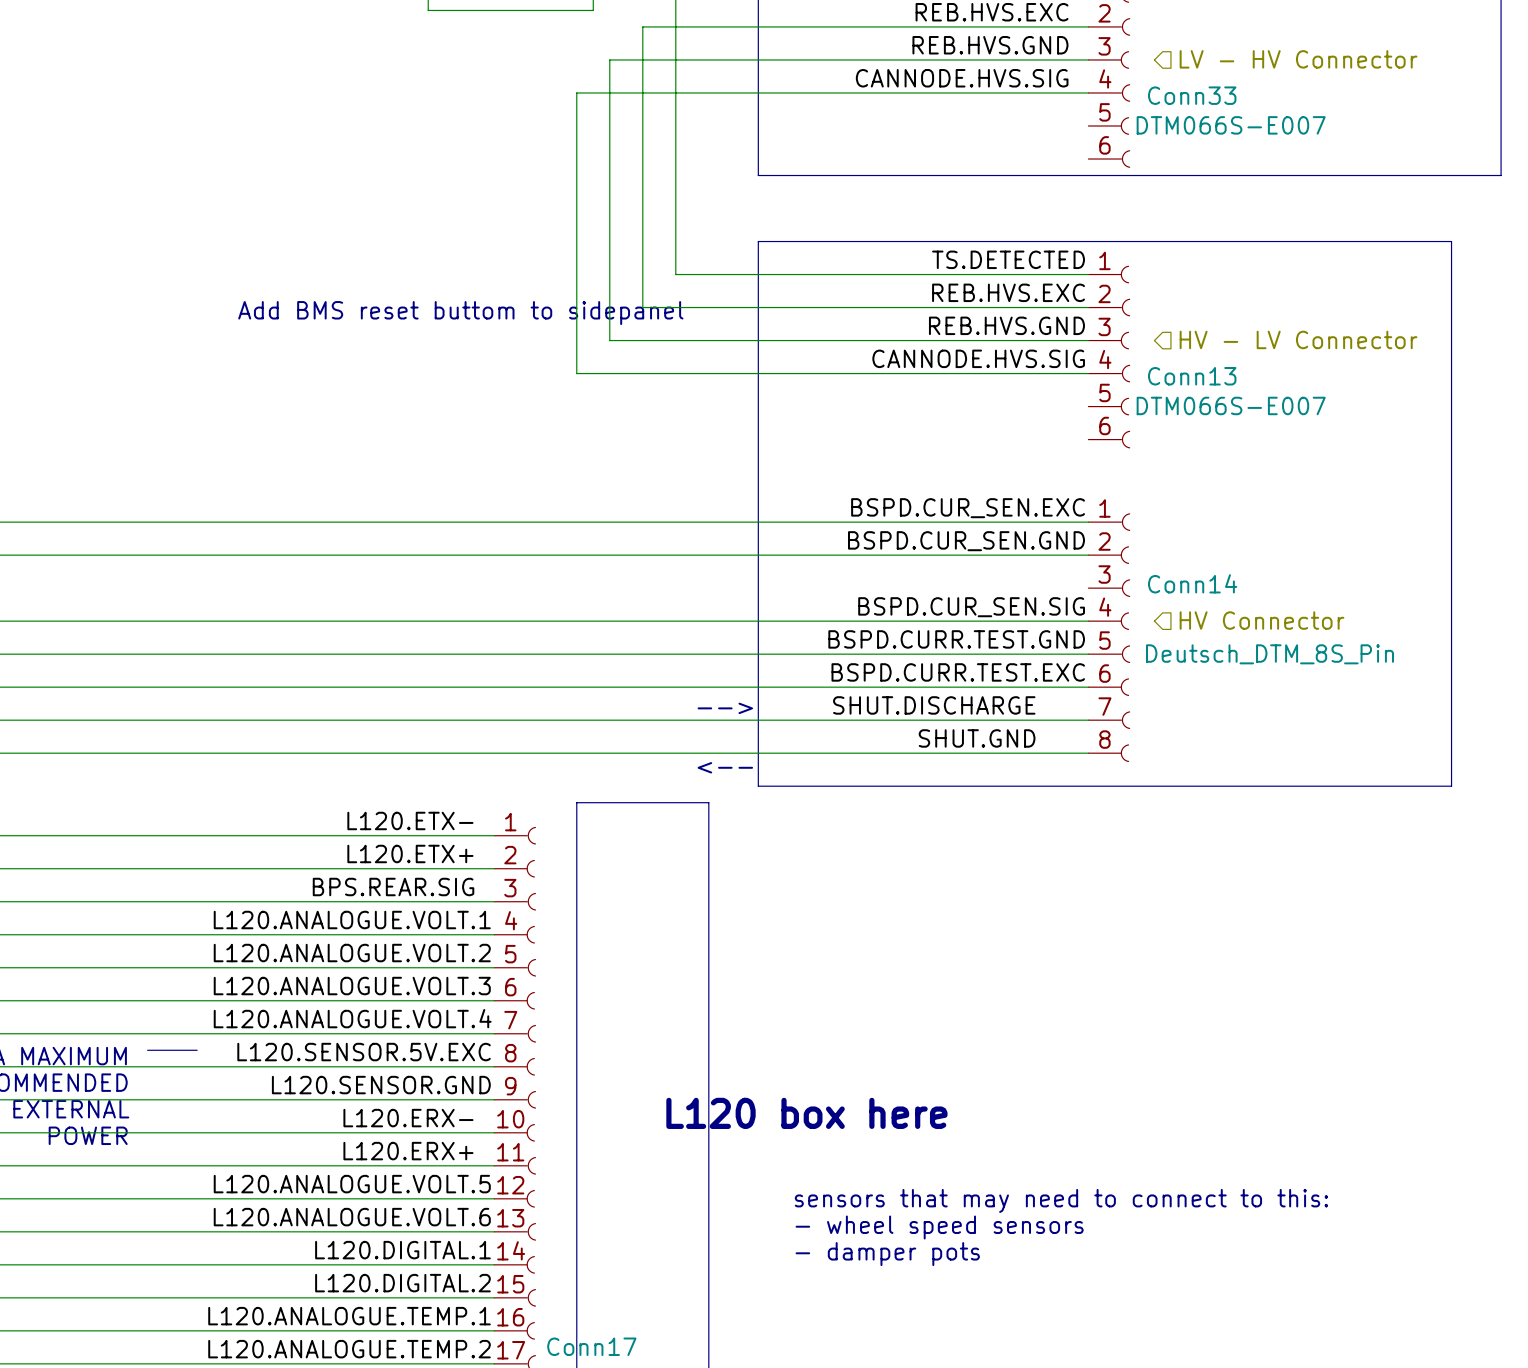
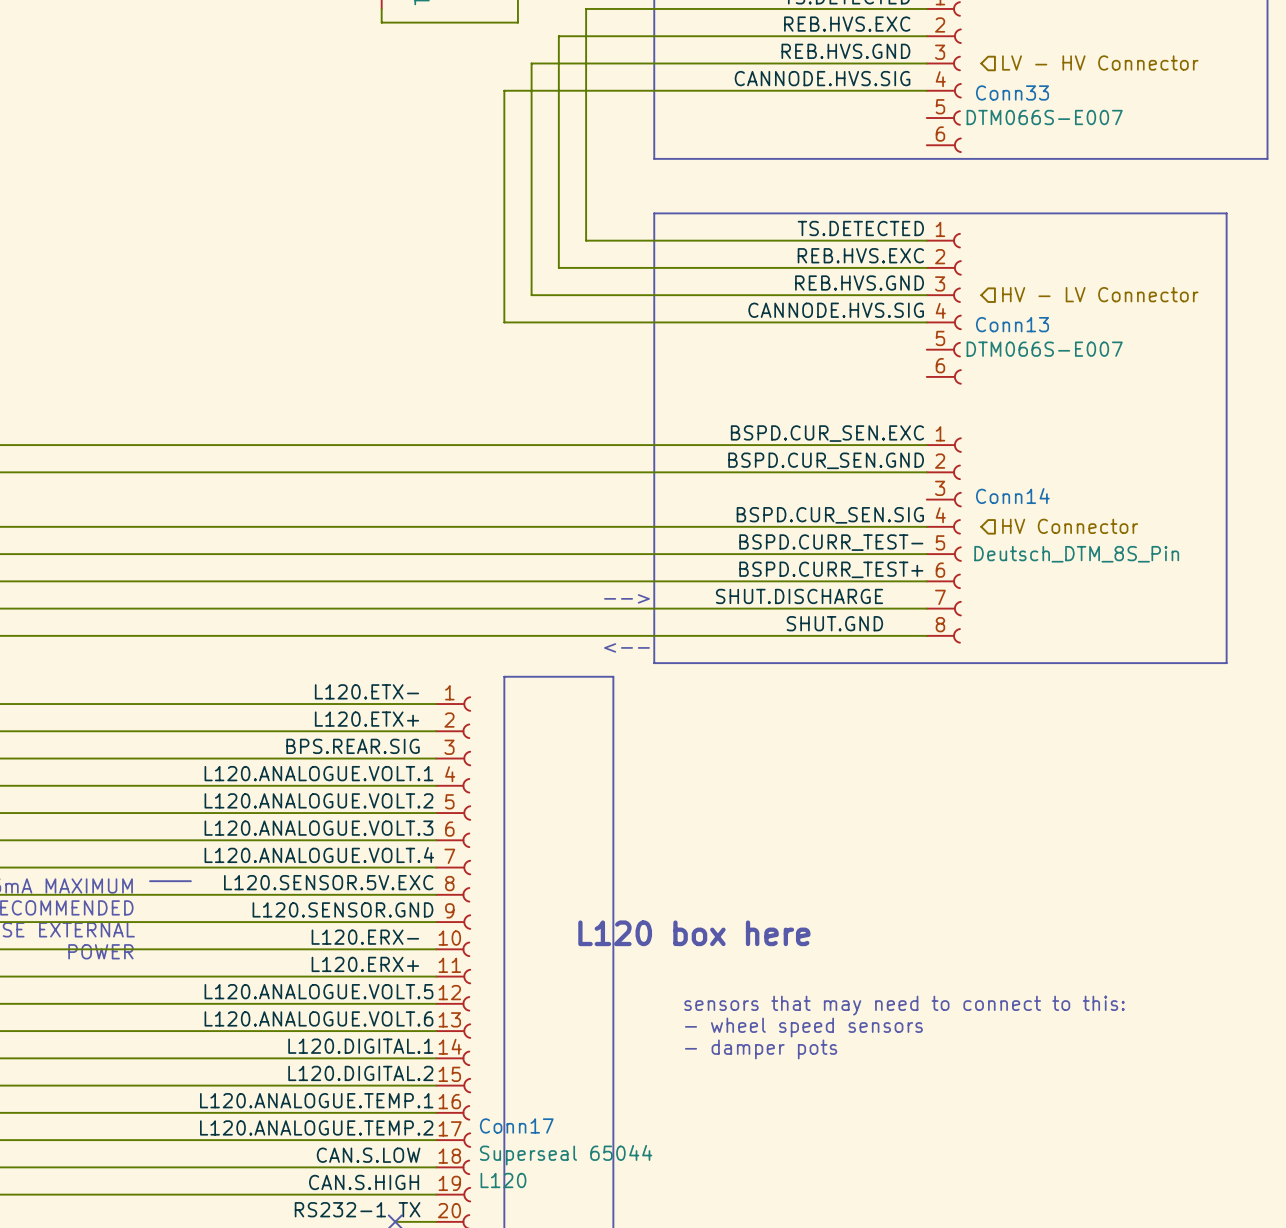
text: Add BMS reset buttom to sidepanel (460, 313) -> none
label: BSPD.CURR.TEST.GND (956, 639) -> BSPD.CURR_TEST- (831, 542)
label: BSPD.CURR.TEST.EXC (958, 672) -> BSPD.CURR_TEST+ (831, 569)

